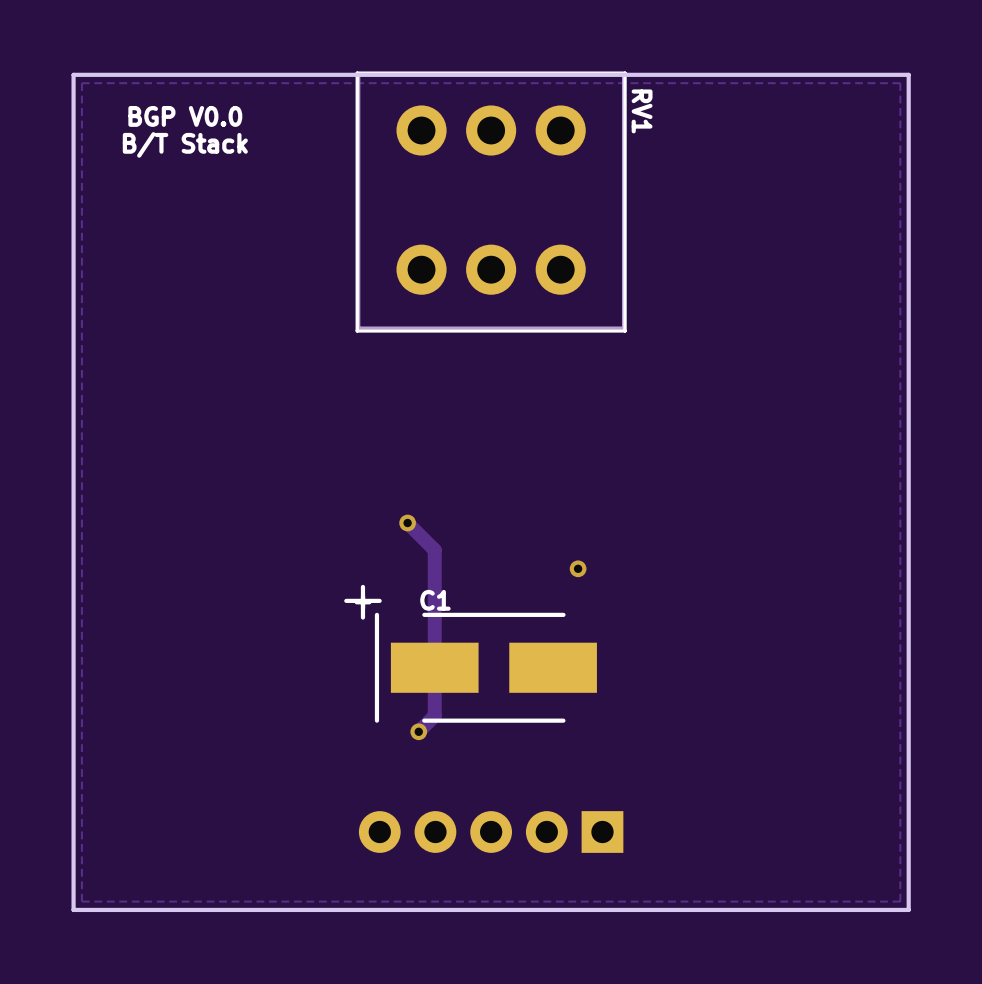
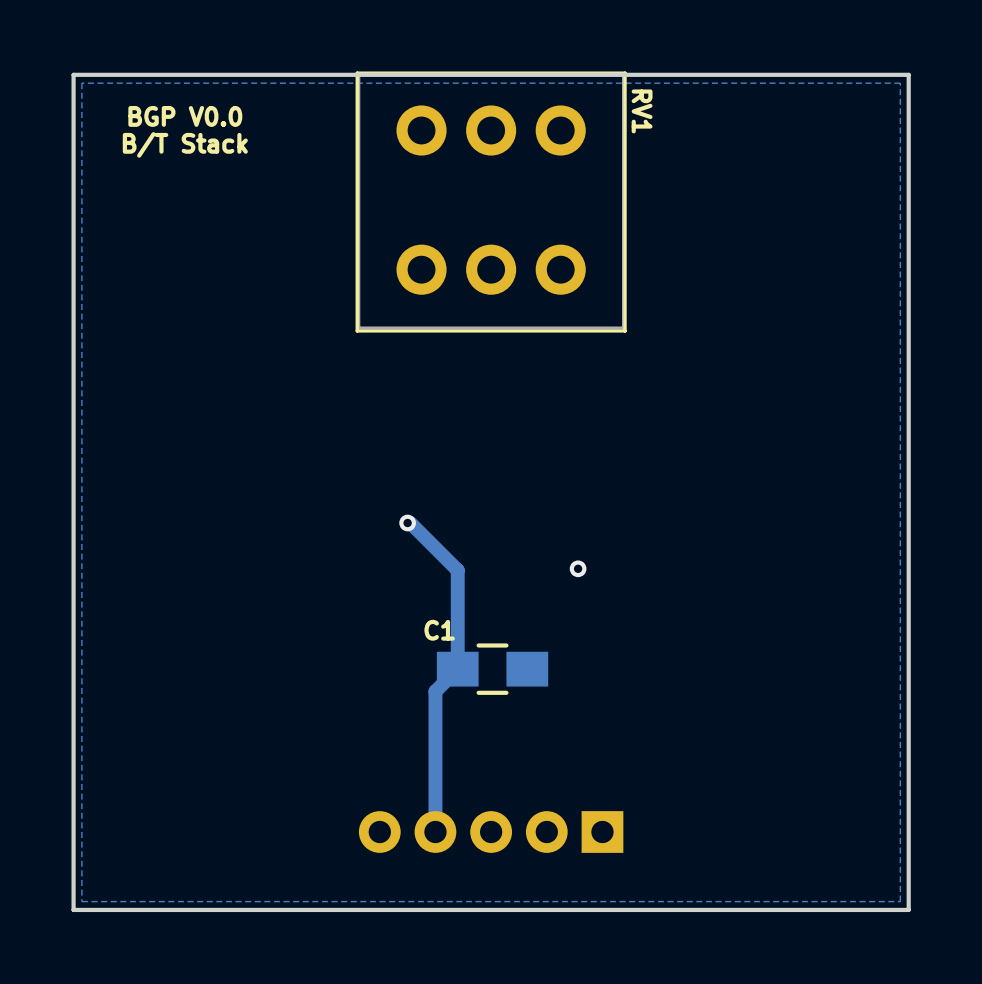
track: (407, 523) (434, 550) (434, 715) (418, 731) -> none
track: none -> (410, 523) (457, 570) (457, 669) (435, 691) (435, 832)
C1 footprint: [344, 584, 597, 723] -> [436, 643, 549, 695]
via: (418, 731) -> none

